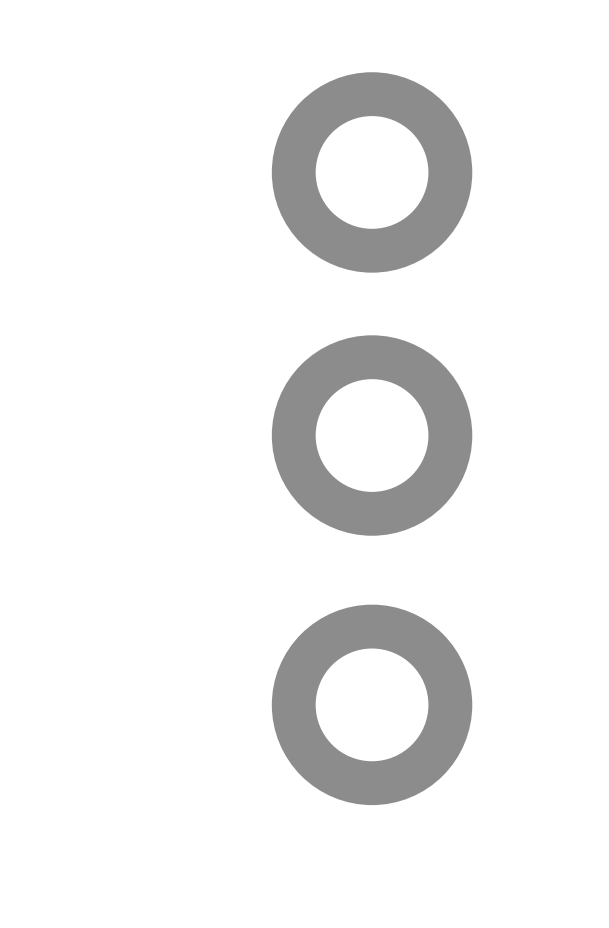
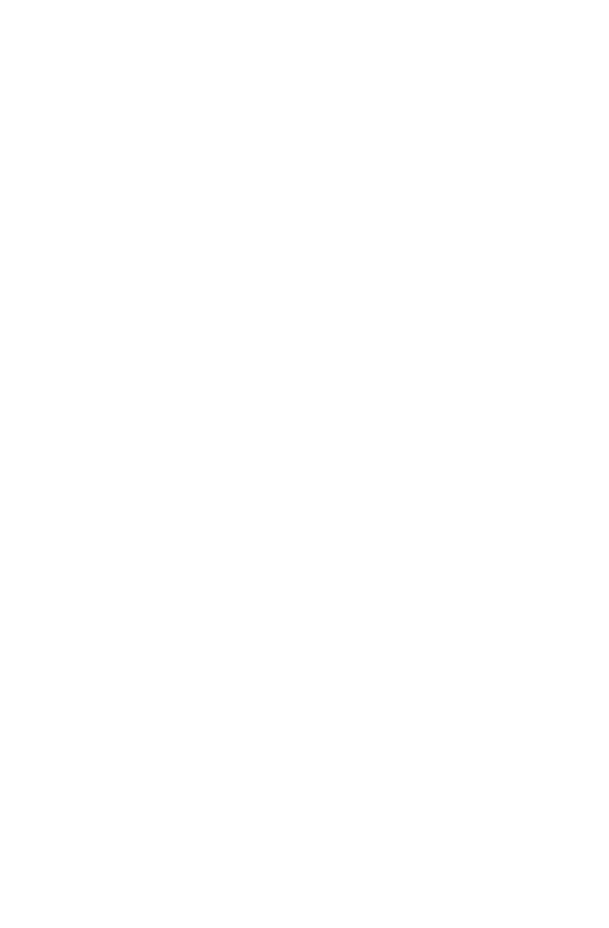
part: (372, 438) -> none

